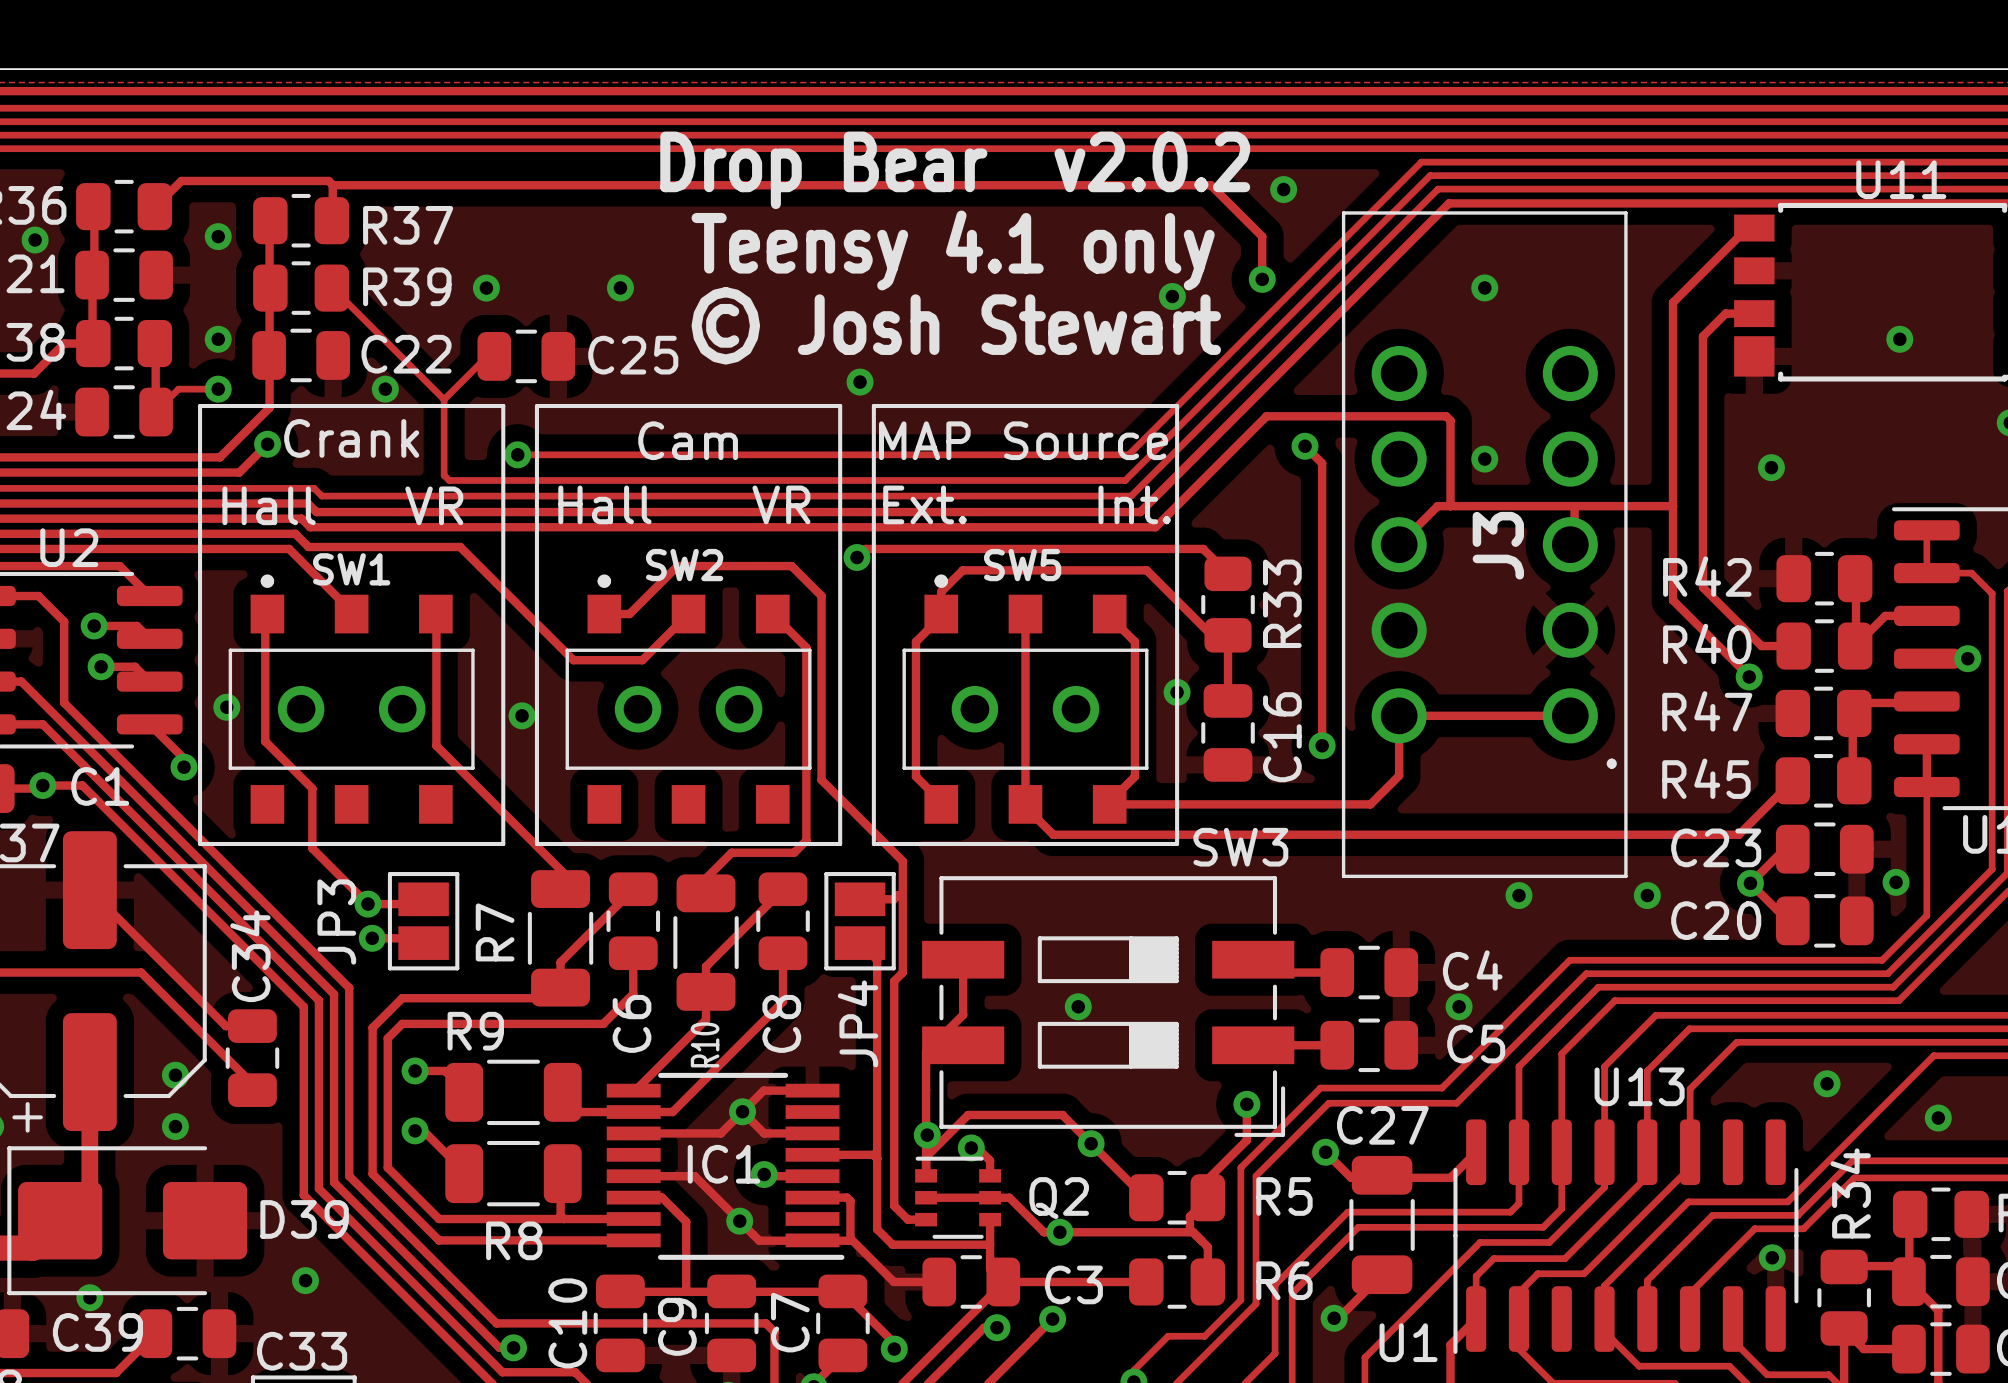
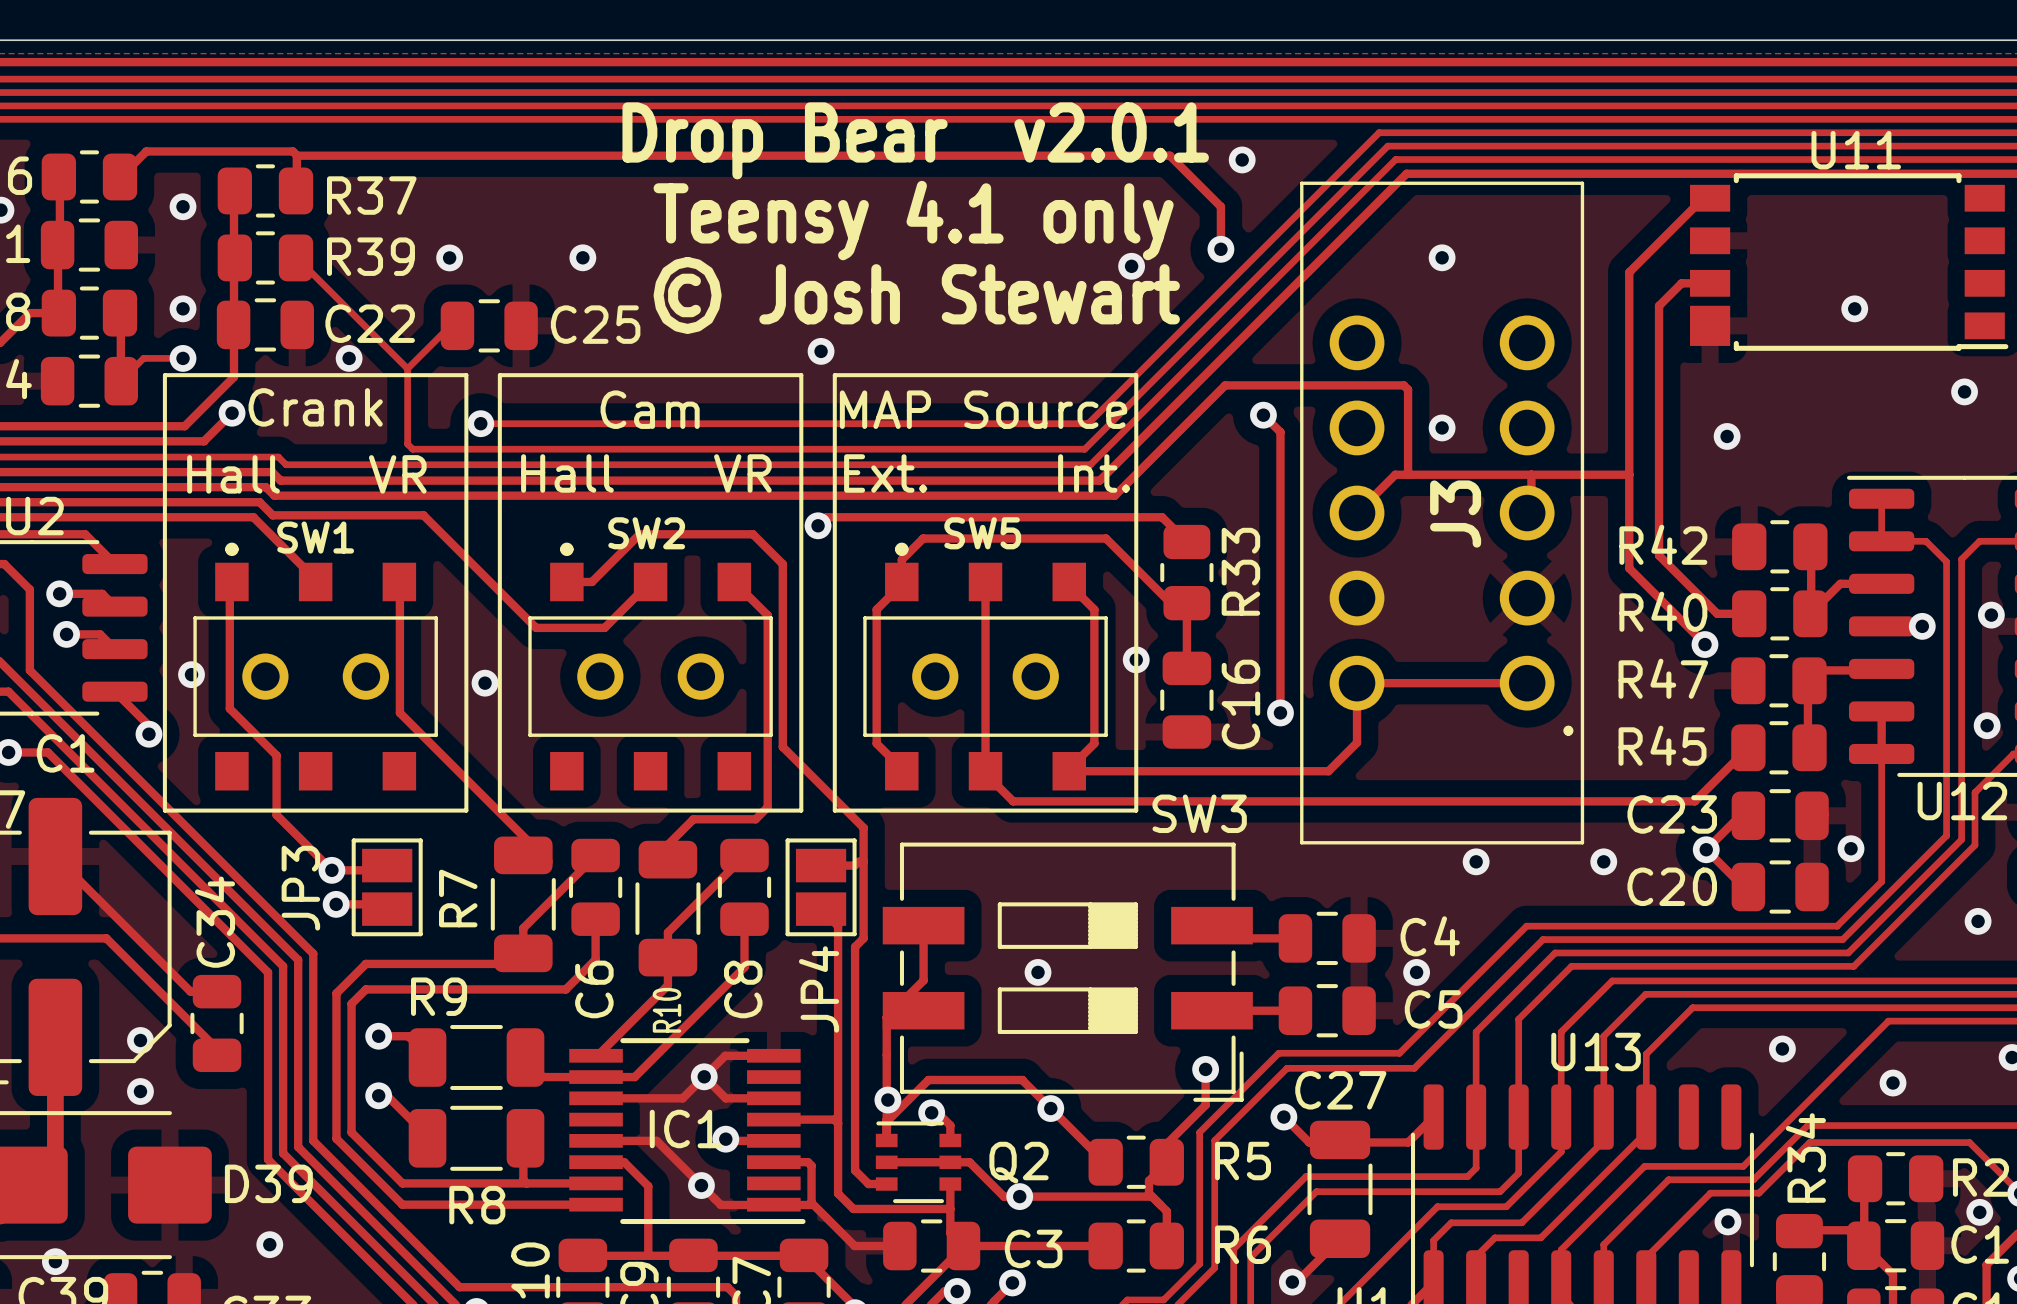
text: Drop Bear v2.0.2 (955, 170) -> Drop Bear v2.0.1 (915, 140)

